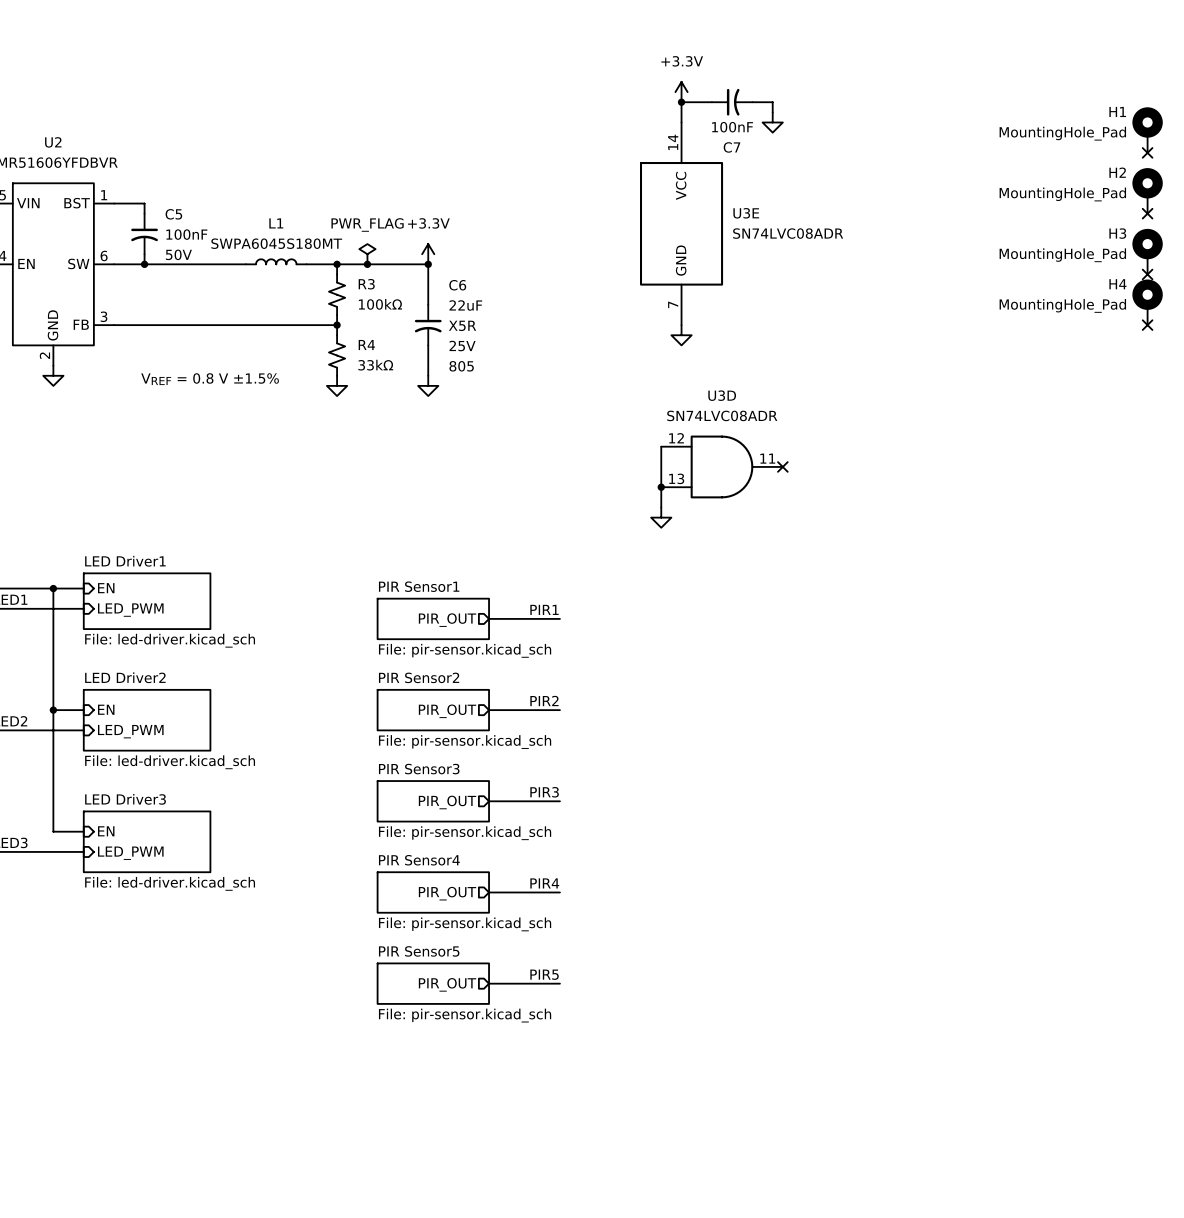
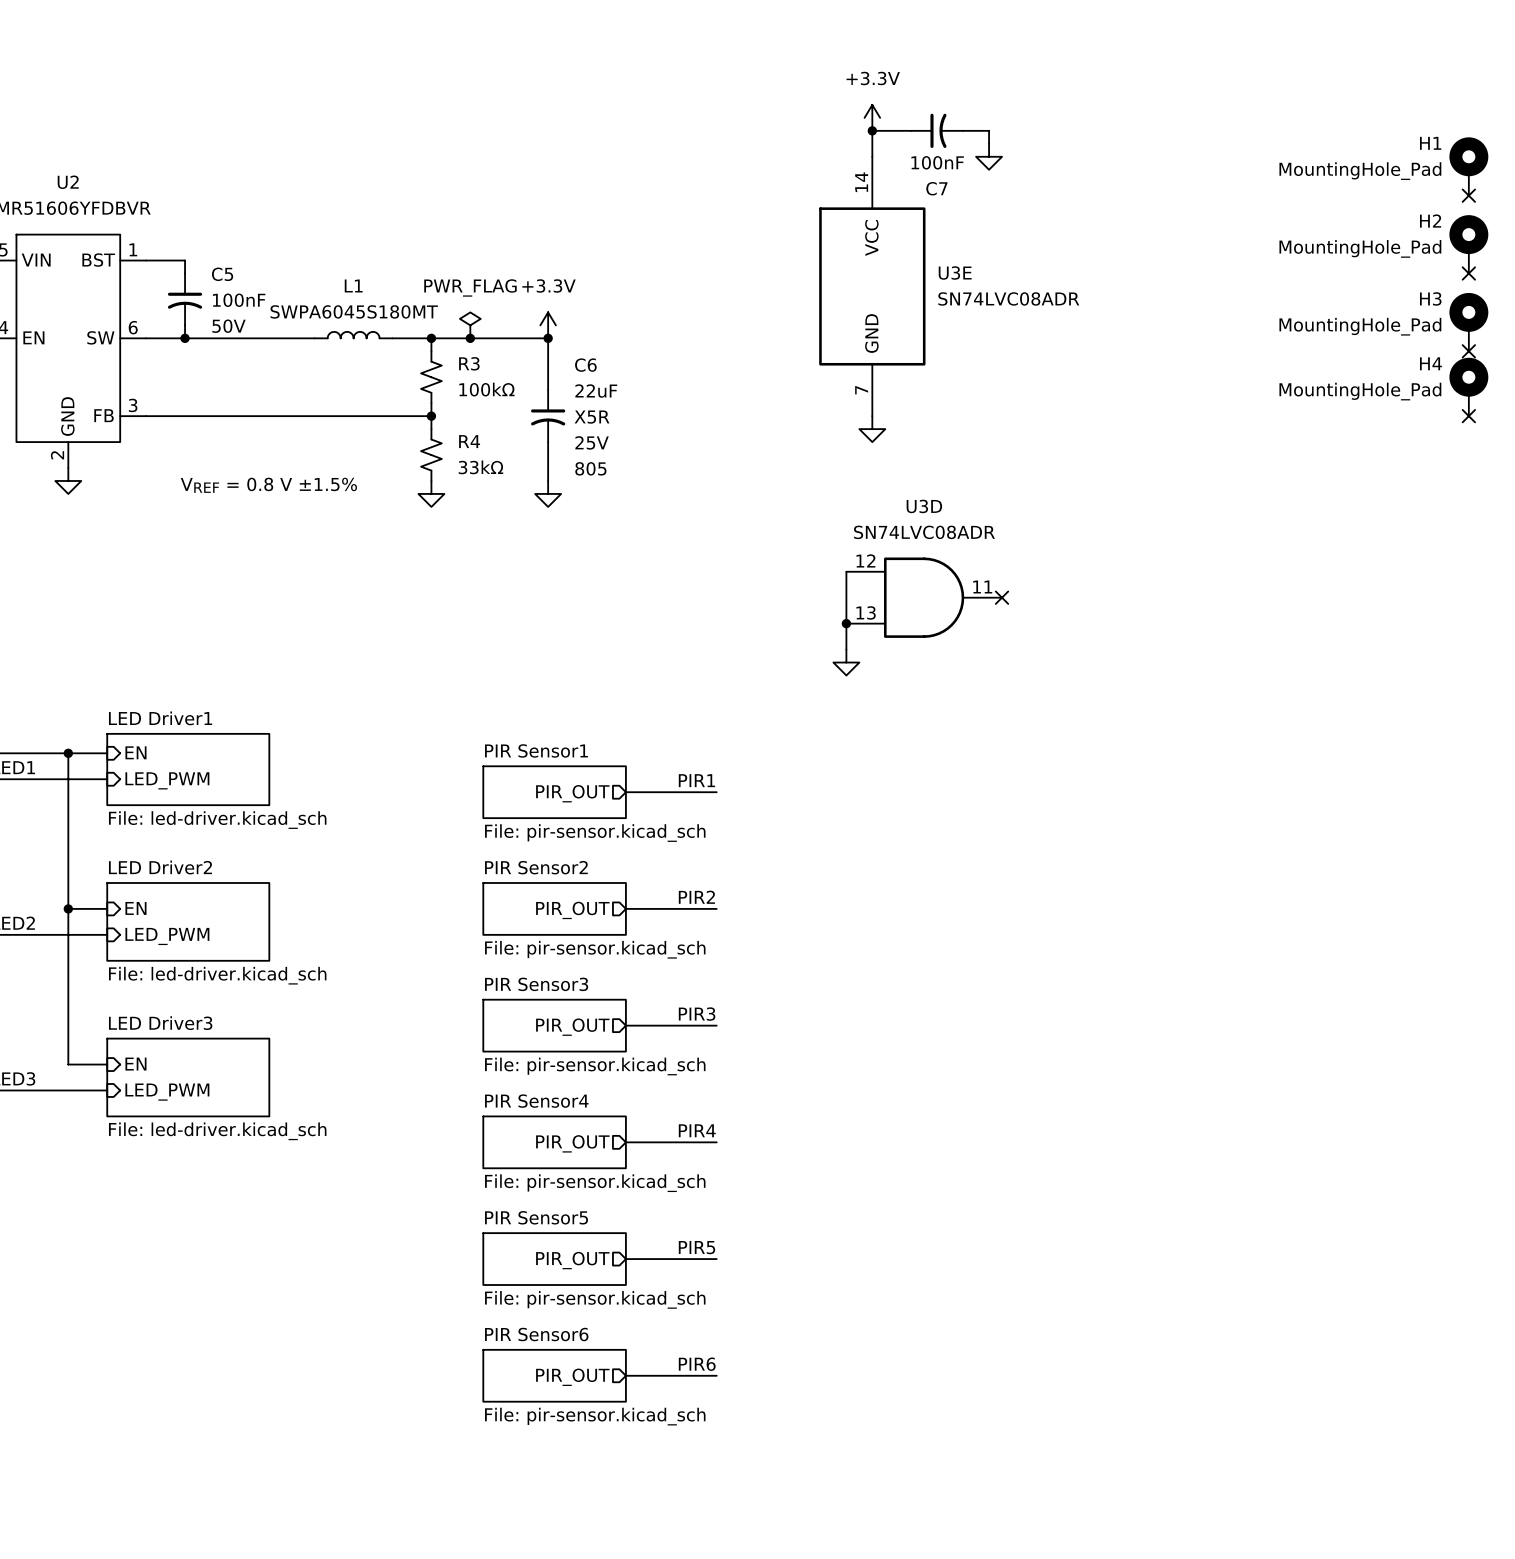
label: none -> PIR6 (697, 1364)
sheet PIR Sensor6: none -> File: pir-sensor.kicad_sch (554, 1375)
wire: none -> (625, 1375) (716, 1375)
sheet pin: none -> PIR_OUT (572, 1377)

